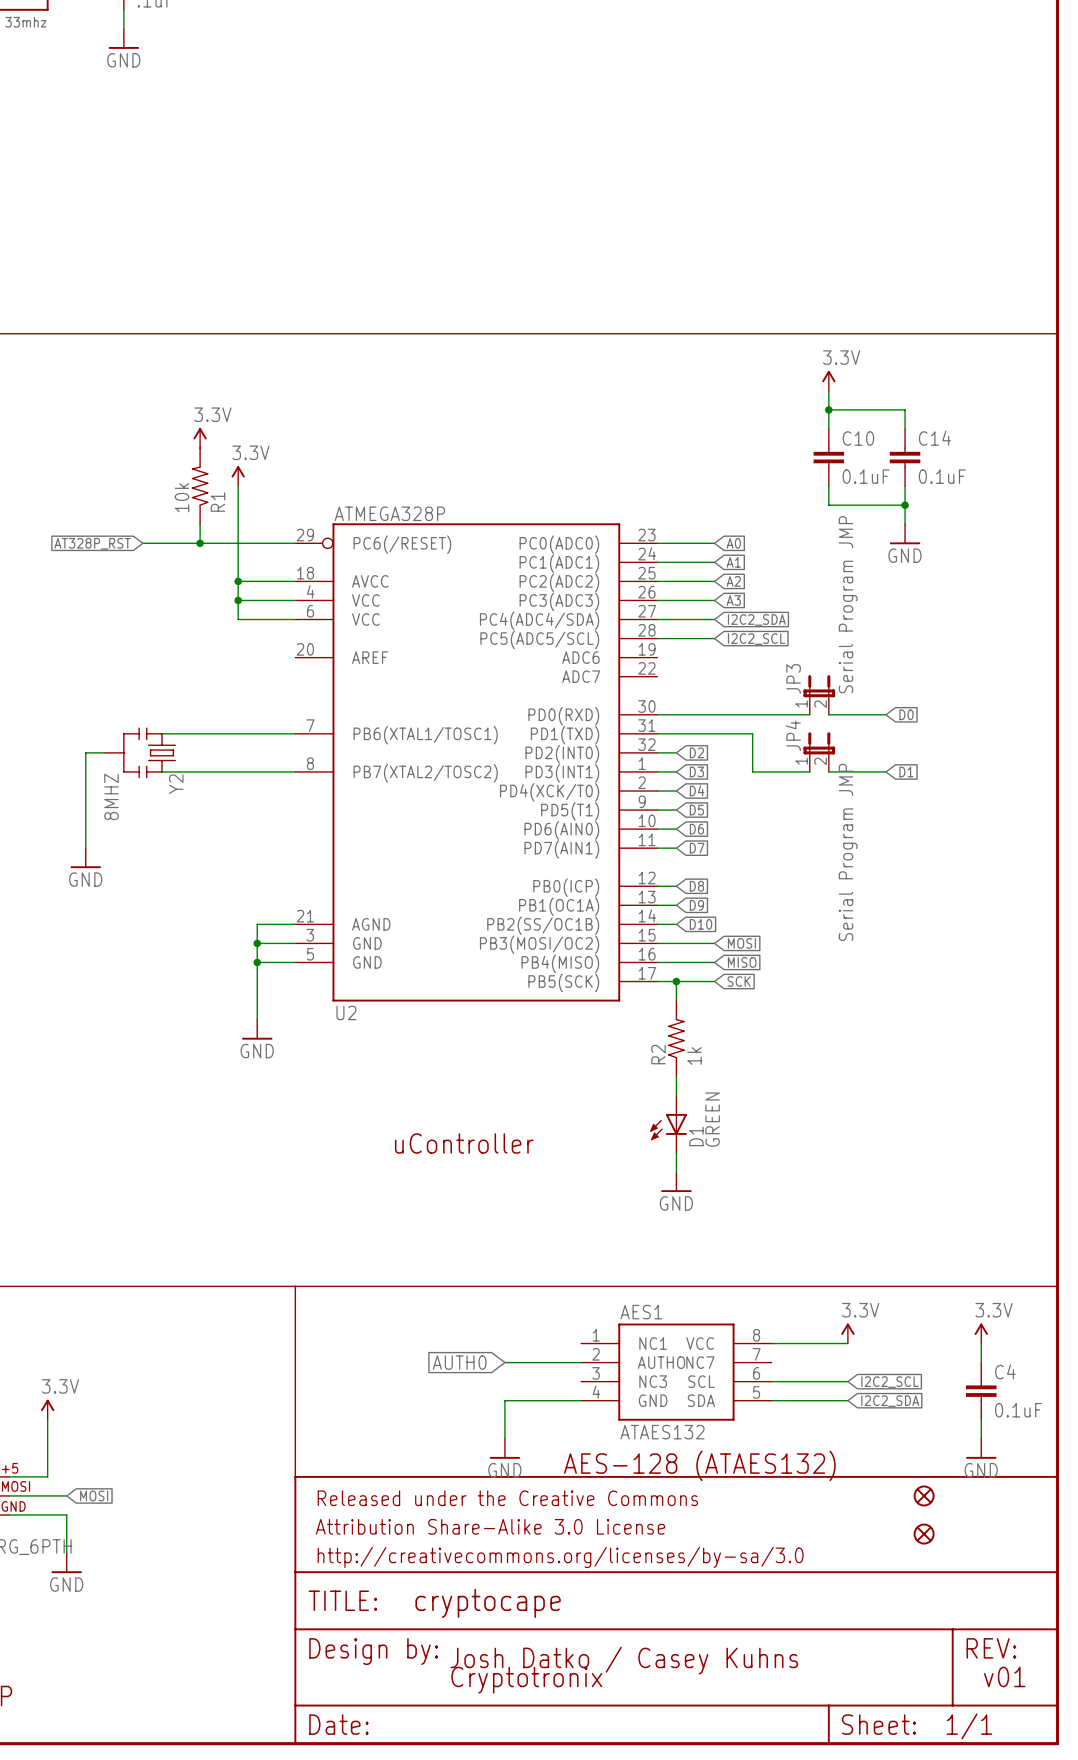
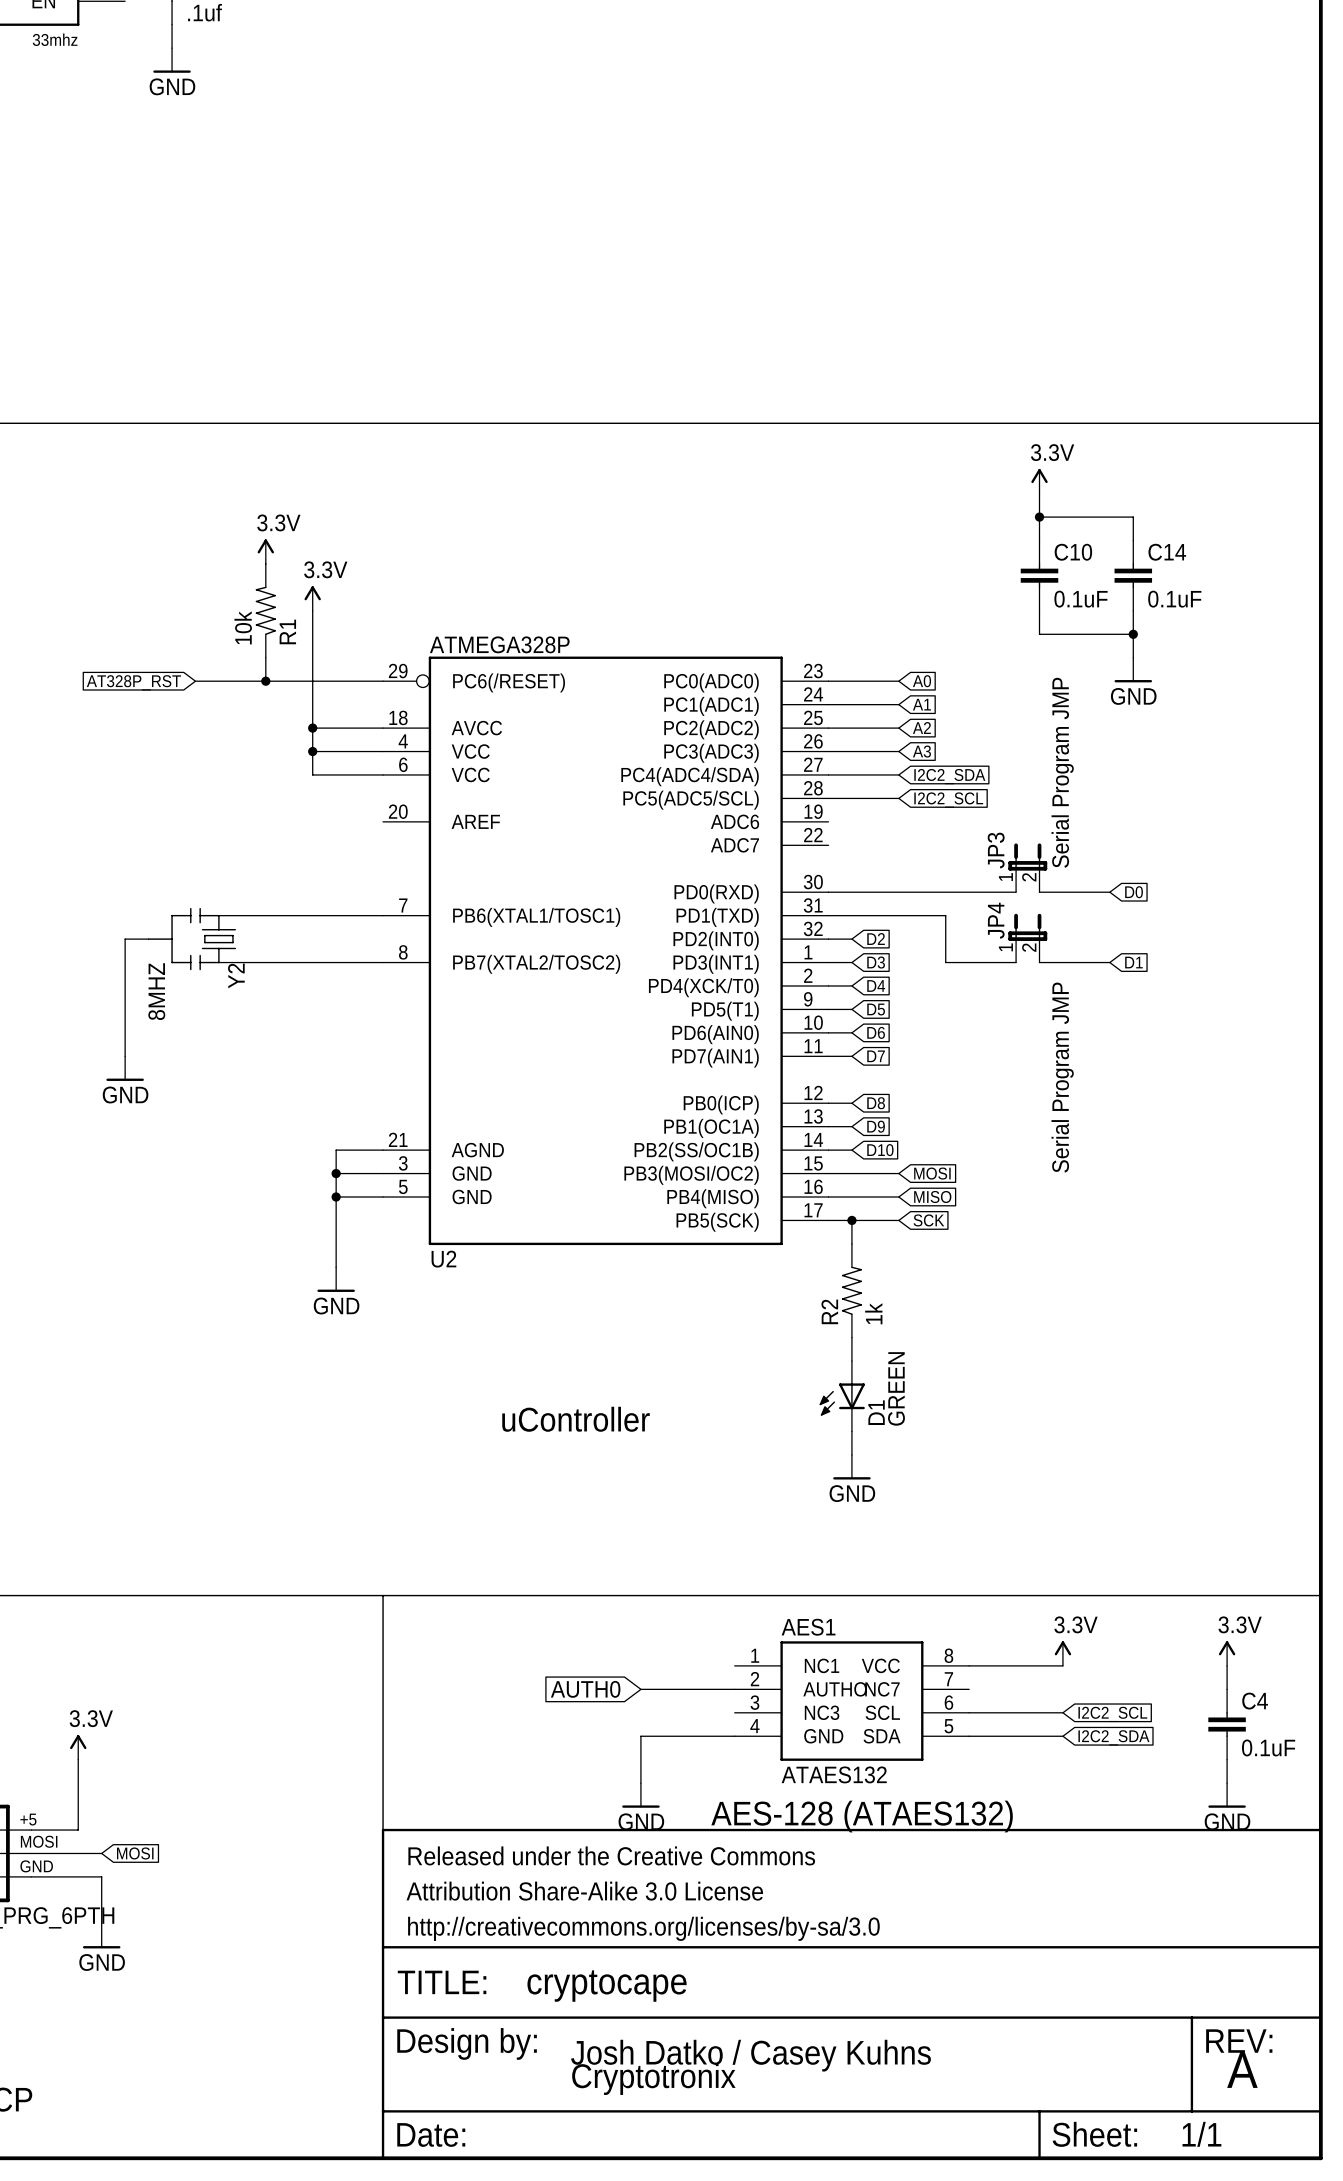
part: (924, 1495) -> none
part: (924, 1534) -> none
text: v01 (1004, 1676) -> A (1242, 2070)

